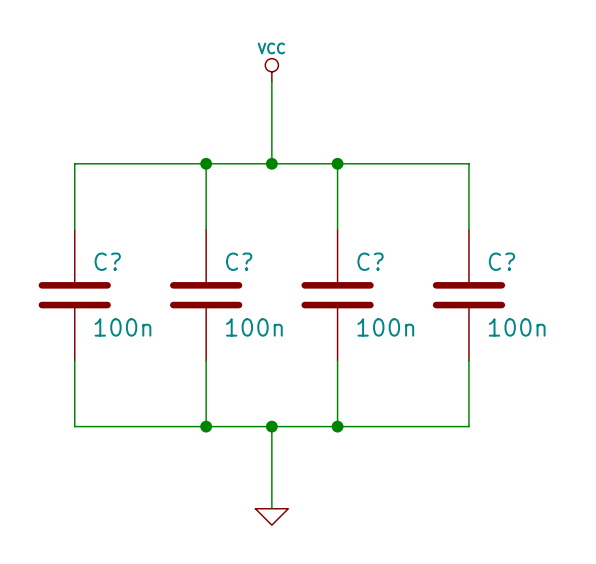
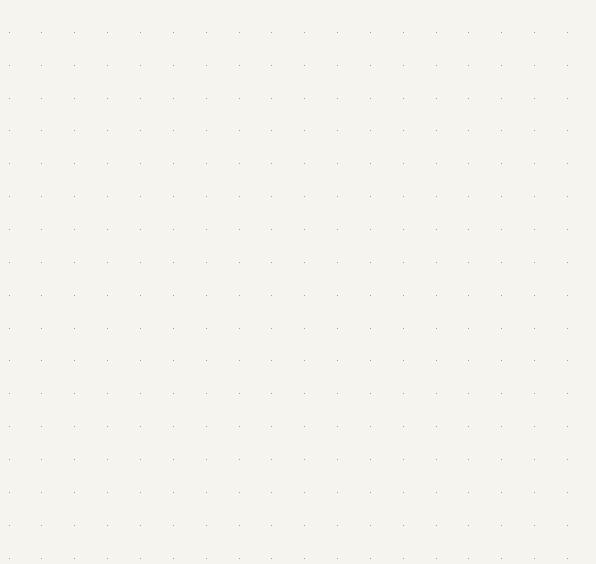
power symbol: VCC (271, 70) -> none
wire: (271, 81) (271, 163) -> none
wire: (206, 163) (206, 229) -> none
junction: (206, 163) -> none
junction: (271, 163) -> none
wire: (337, 163) (337, 229) -> none
junction: (337, 163) -> none
wire: (74, 229) (74, 163) (468, 163) (468, 229) -> none
C?: 100n (74, 295) -> none
C?: 100n (206, 295) -> none
C?: 100n (337, 295) -> none
C?: 100n (468, 295) -> none
wire: (74, 360) (74, 426) (468, 426) (468, 360) -> none
wire: (206, 360) (206, 426) -> none
wire: (337, 360) (337, 426) -> none
junction: (206, 426) -> none
wire: (271, 426) (271, 508) -> none
junction: (271, 426) -> none
junction: (337, 426) -> none
power symbol: (271, 516) -> none

